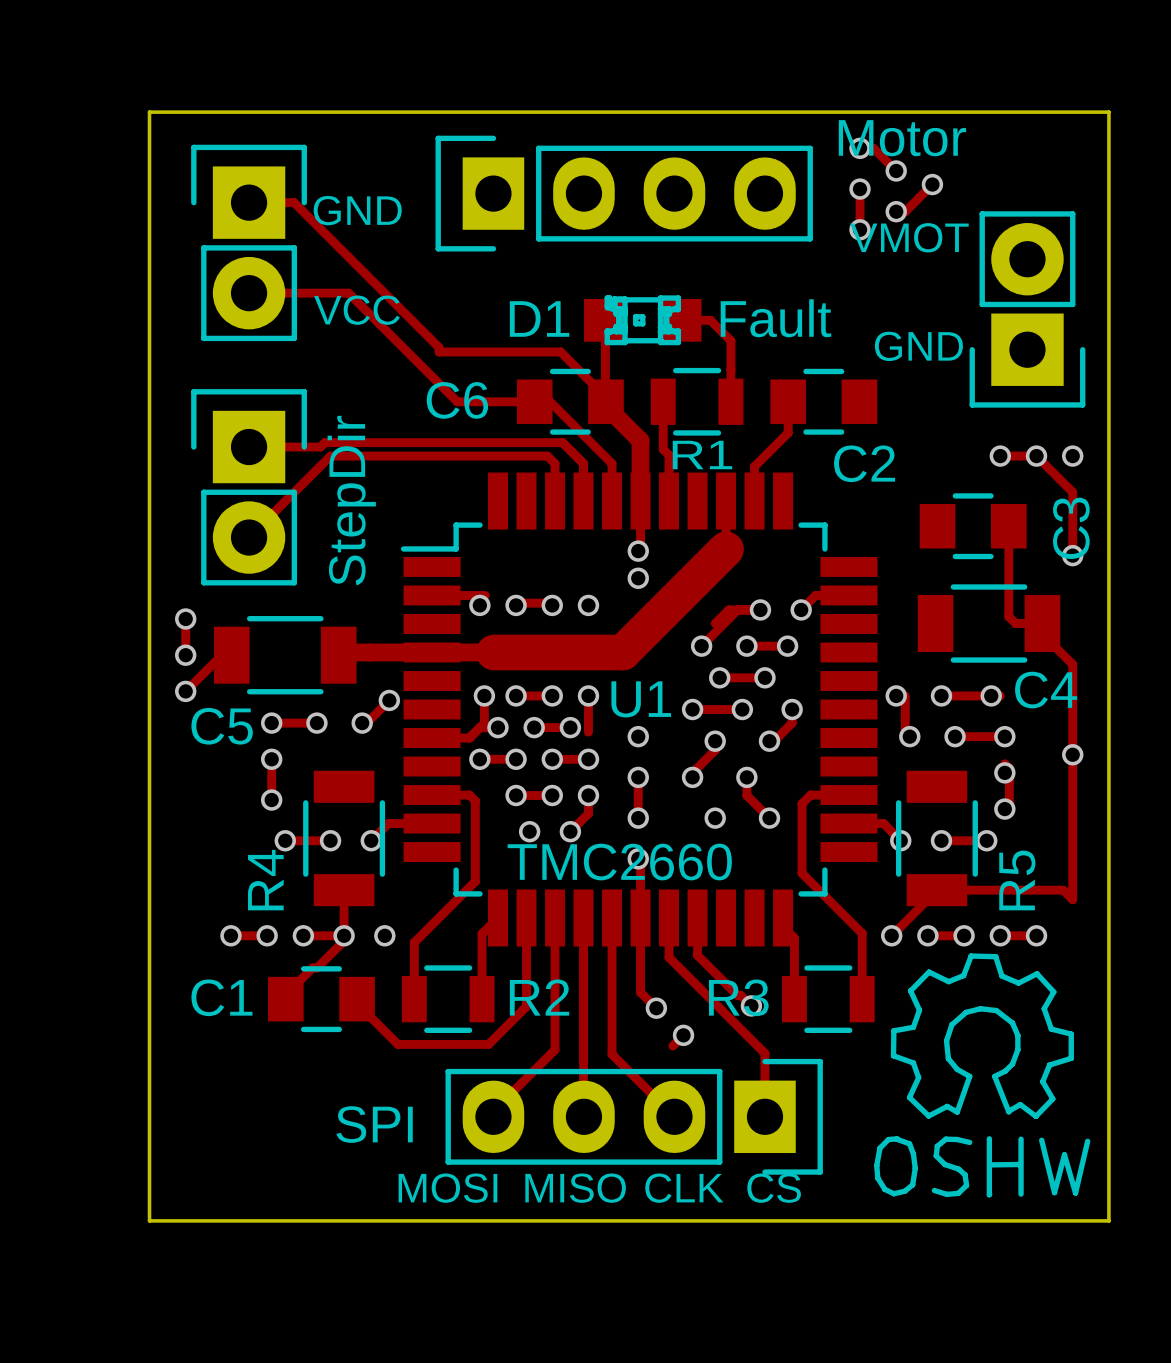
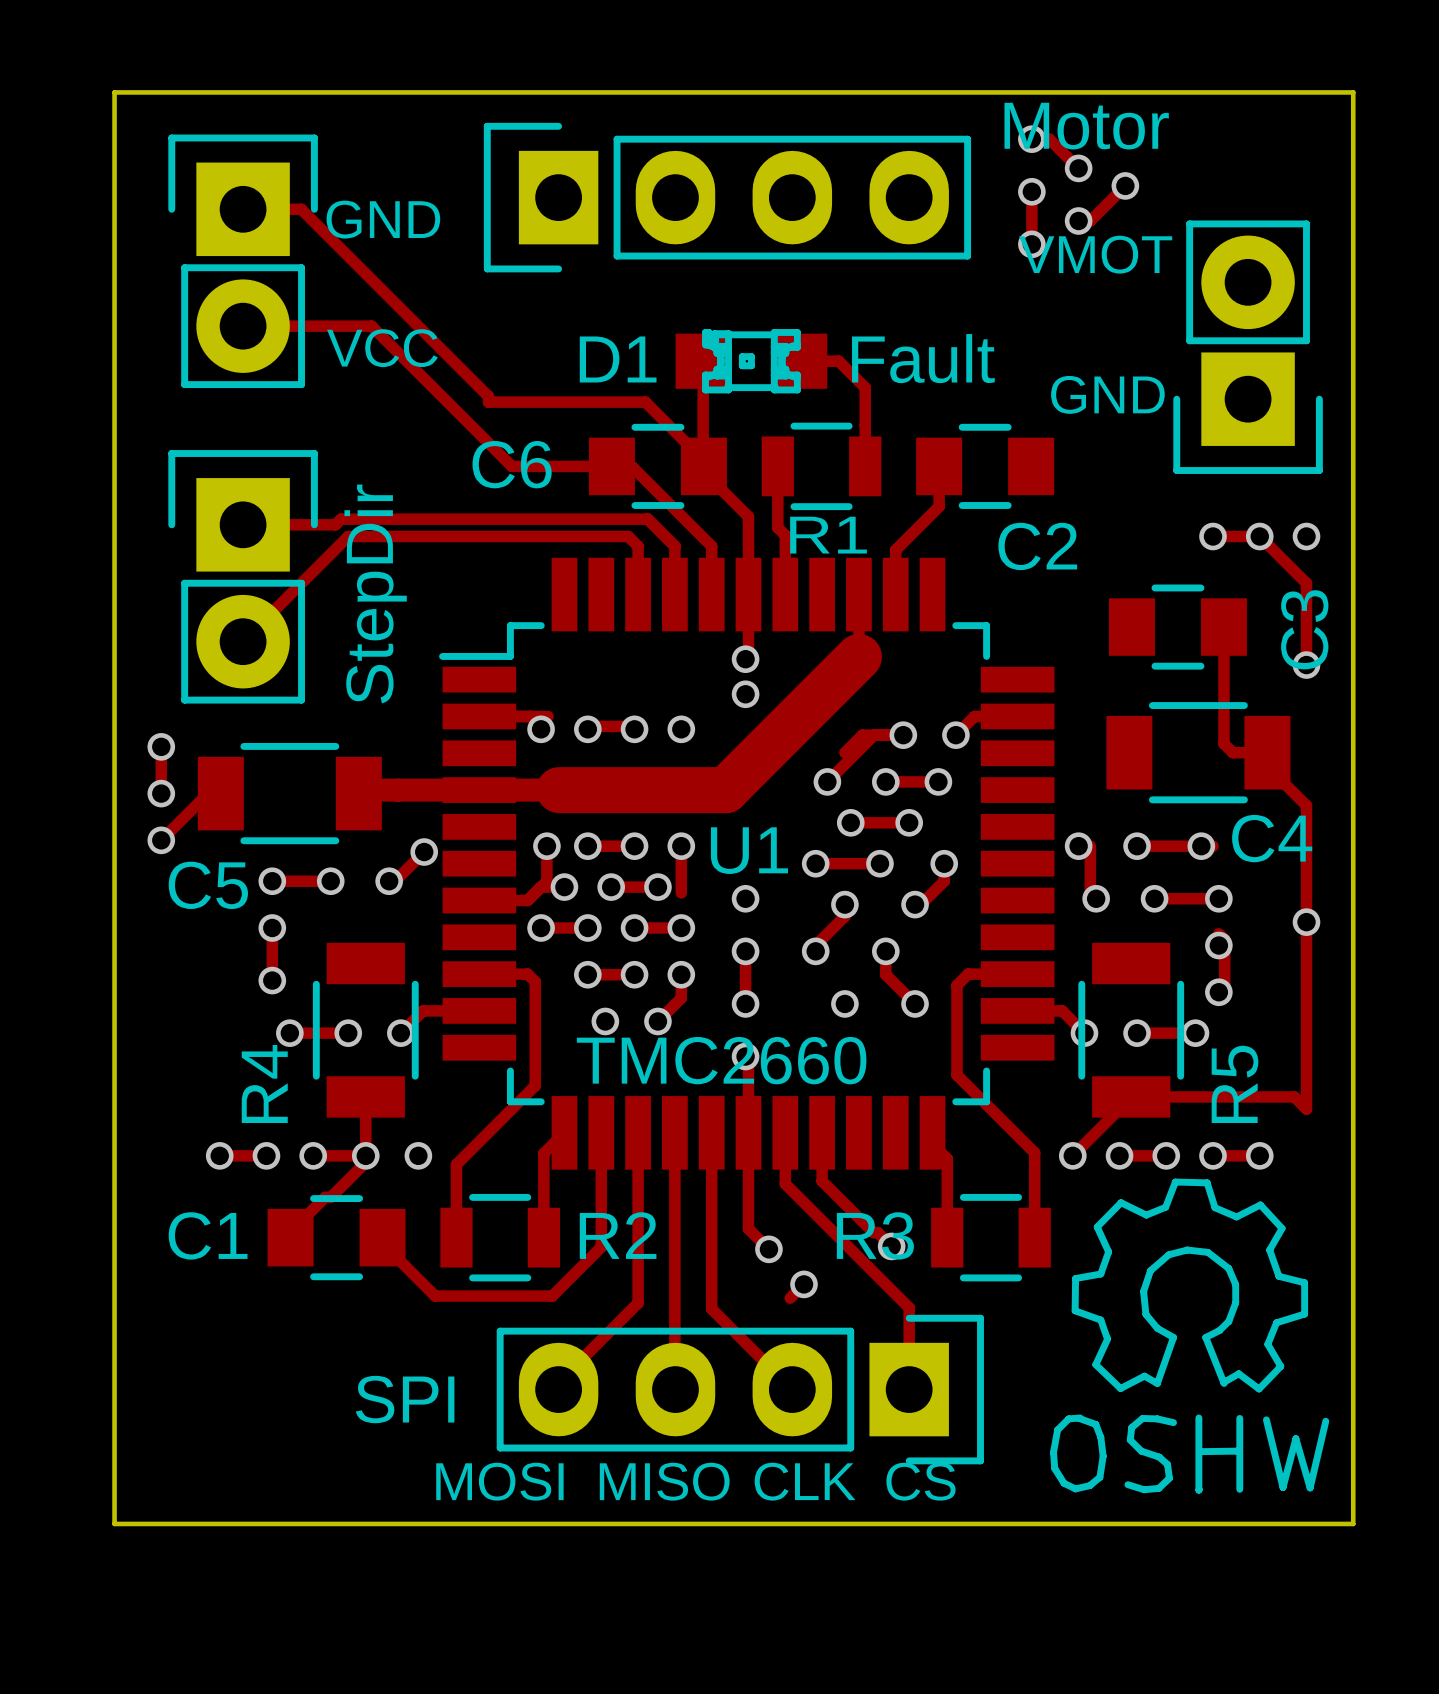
track width: thick (606, 406) (640, 440) (640, 501) -> thin (703, 472) (748, 516) (748, 594)

